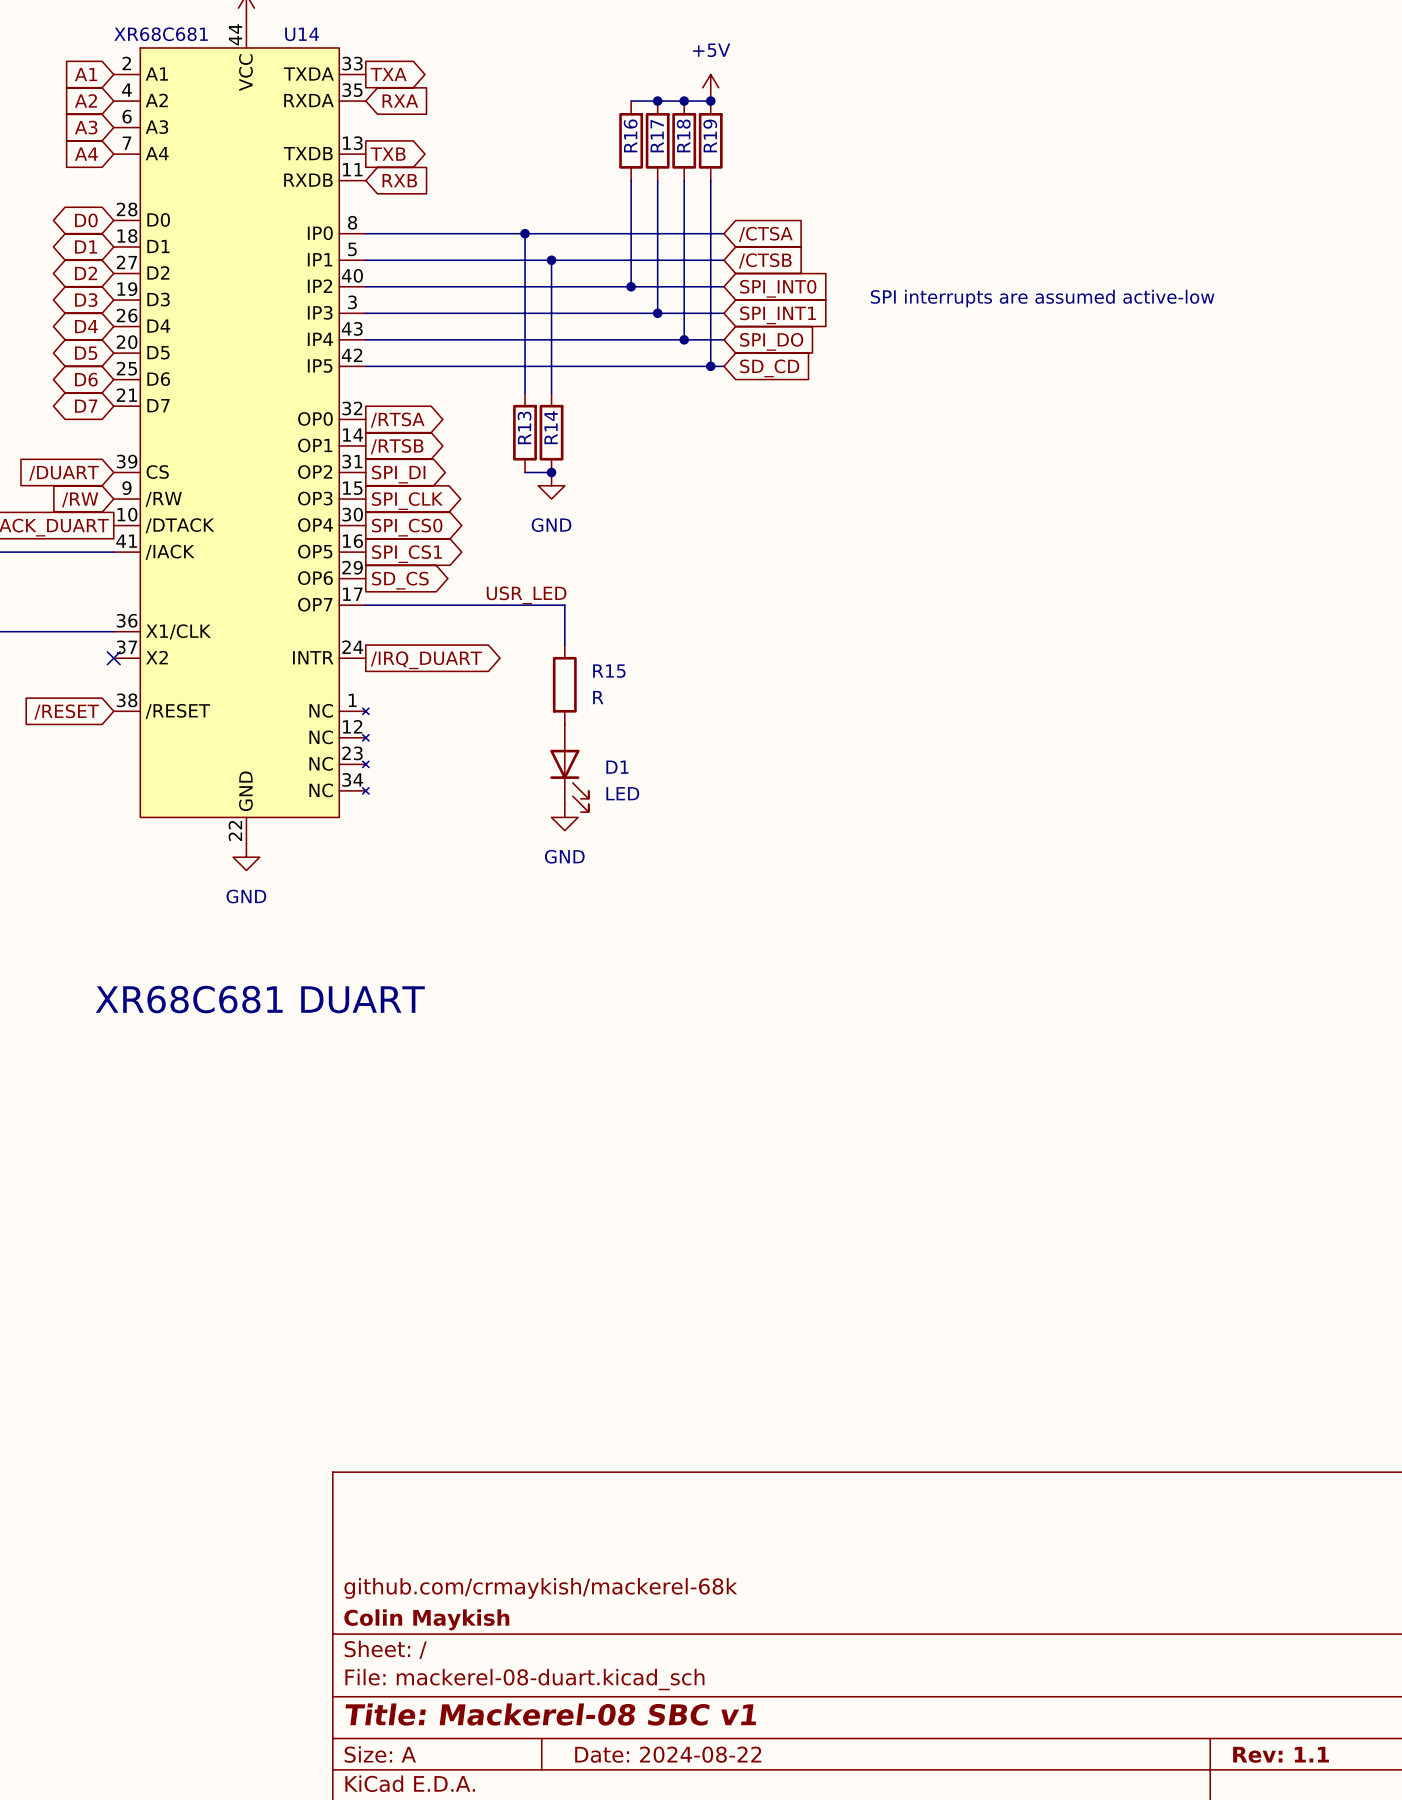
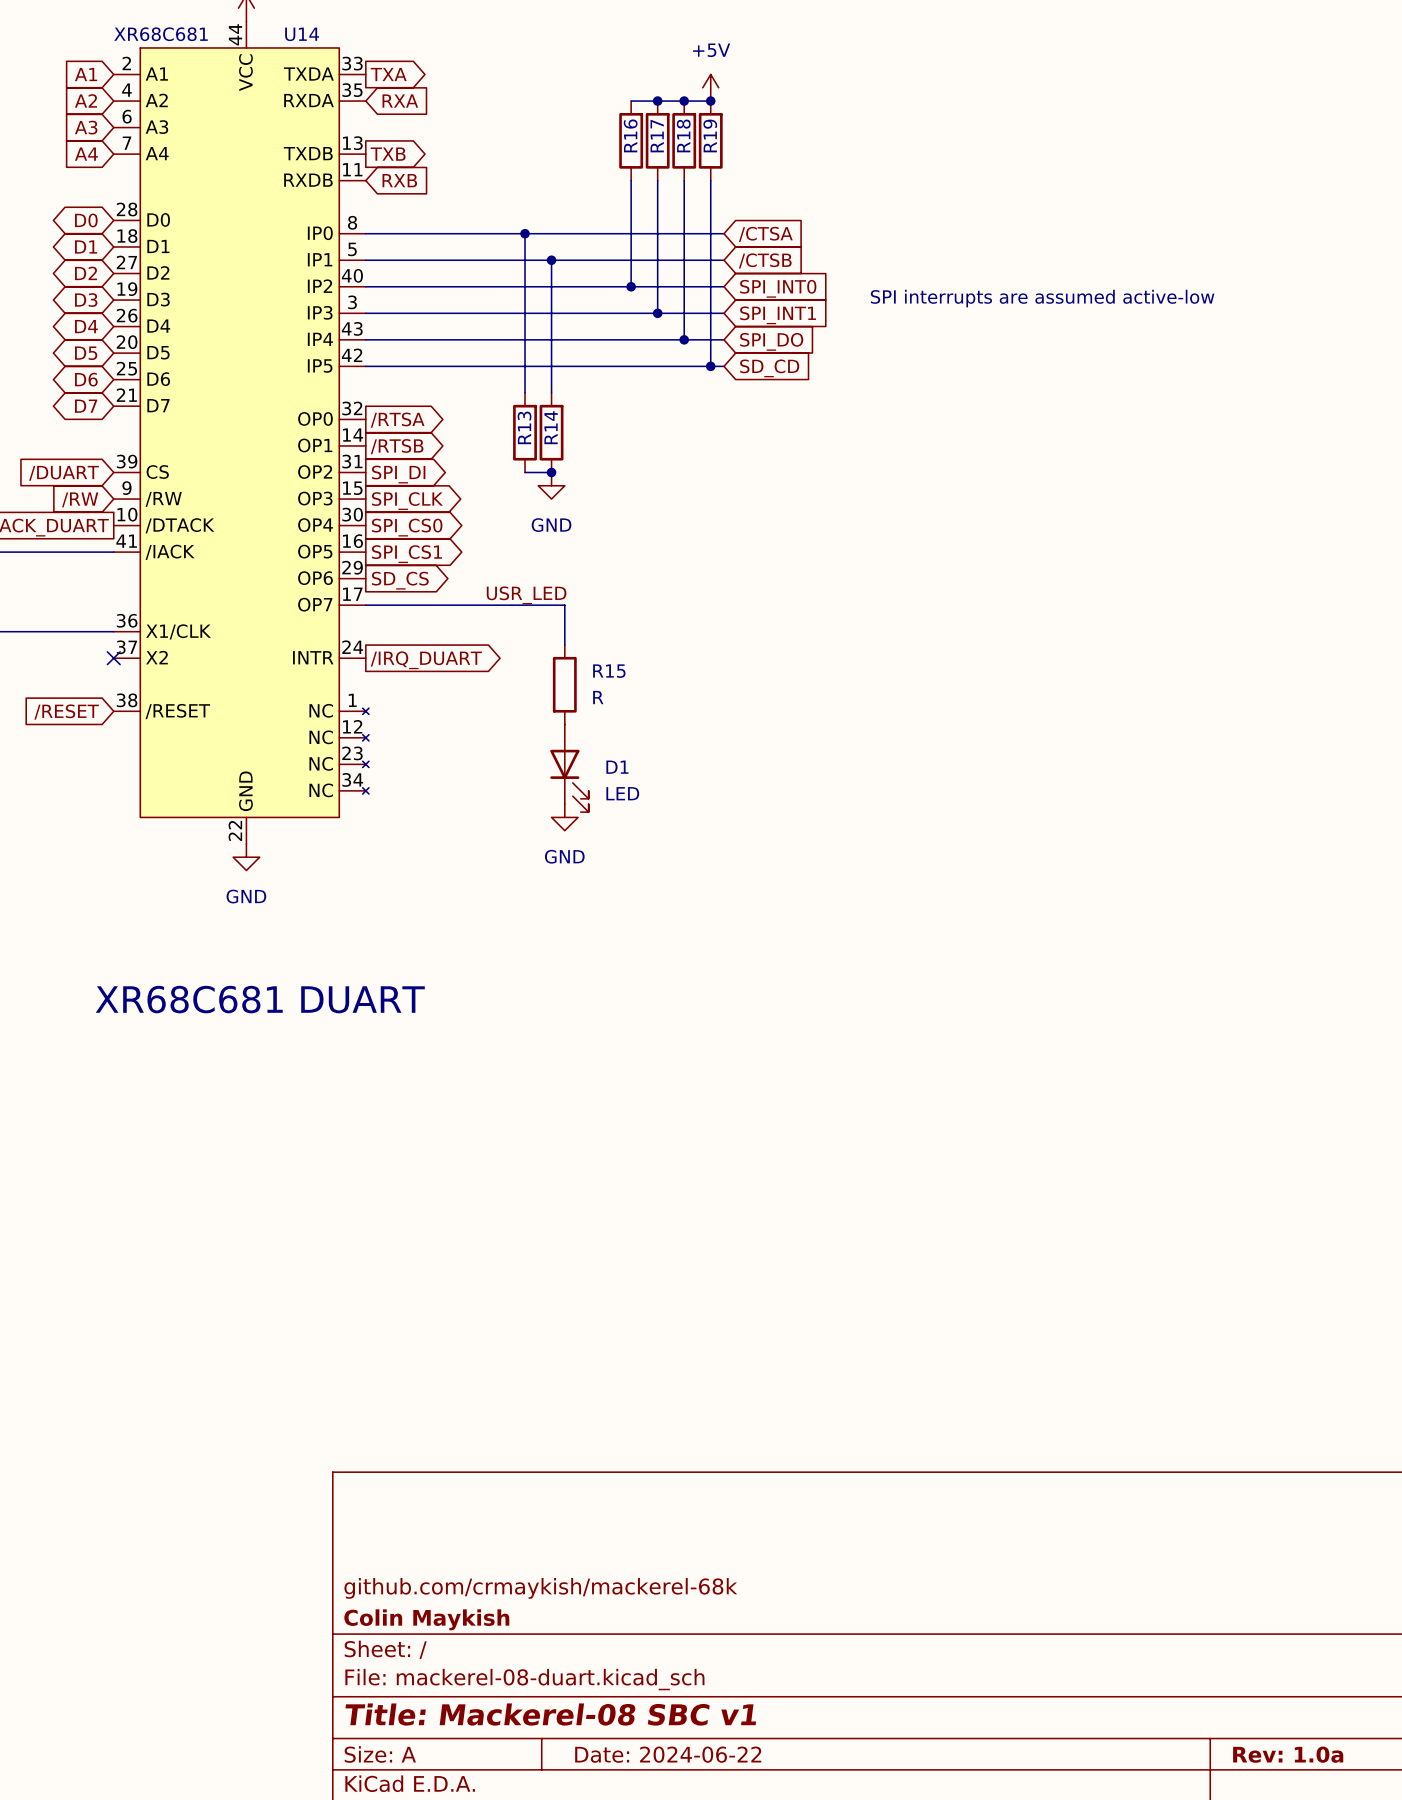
title block: Date: 2024-08-22 (668, 1754) -> Date: 2024-06-22 (668, 1754)
title block: Rev: 1.1 (1281, 1754) -> Rev: 1.0a (1288, 1754)

